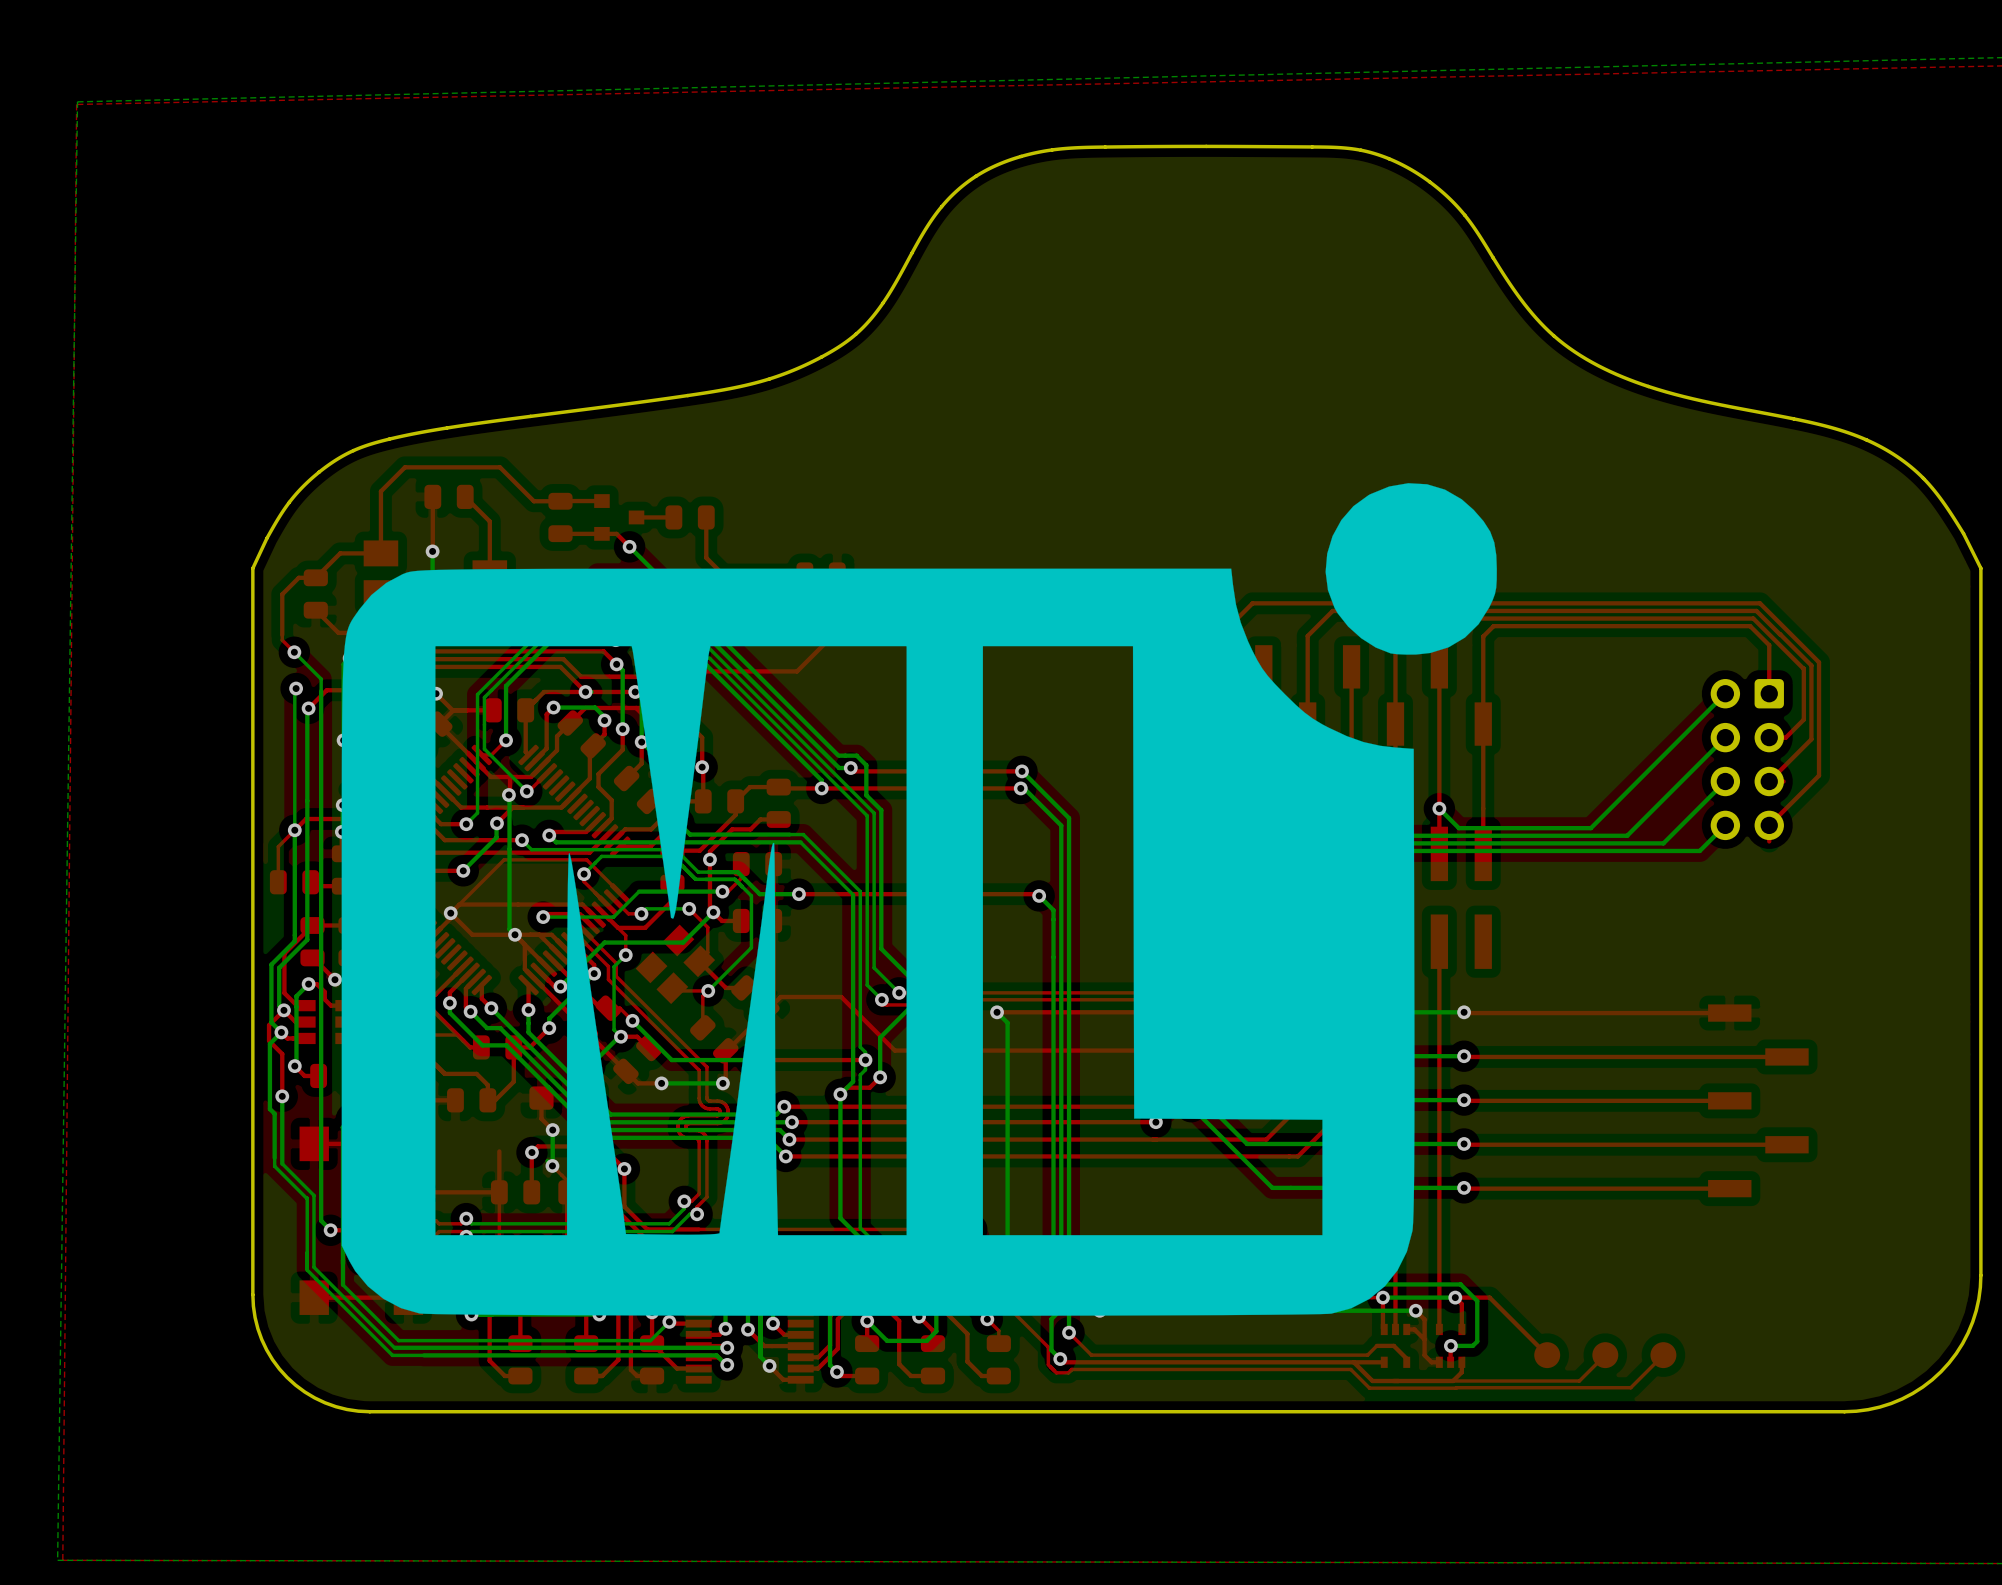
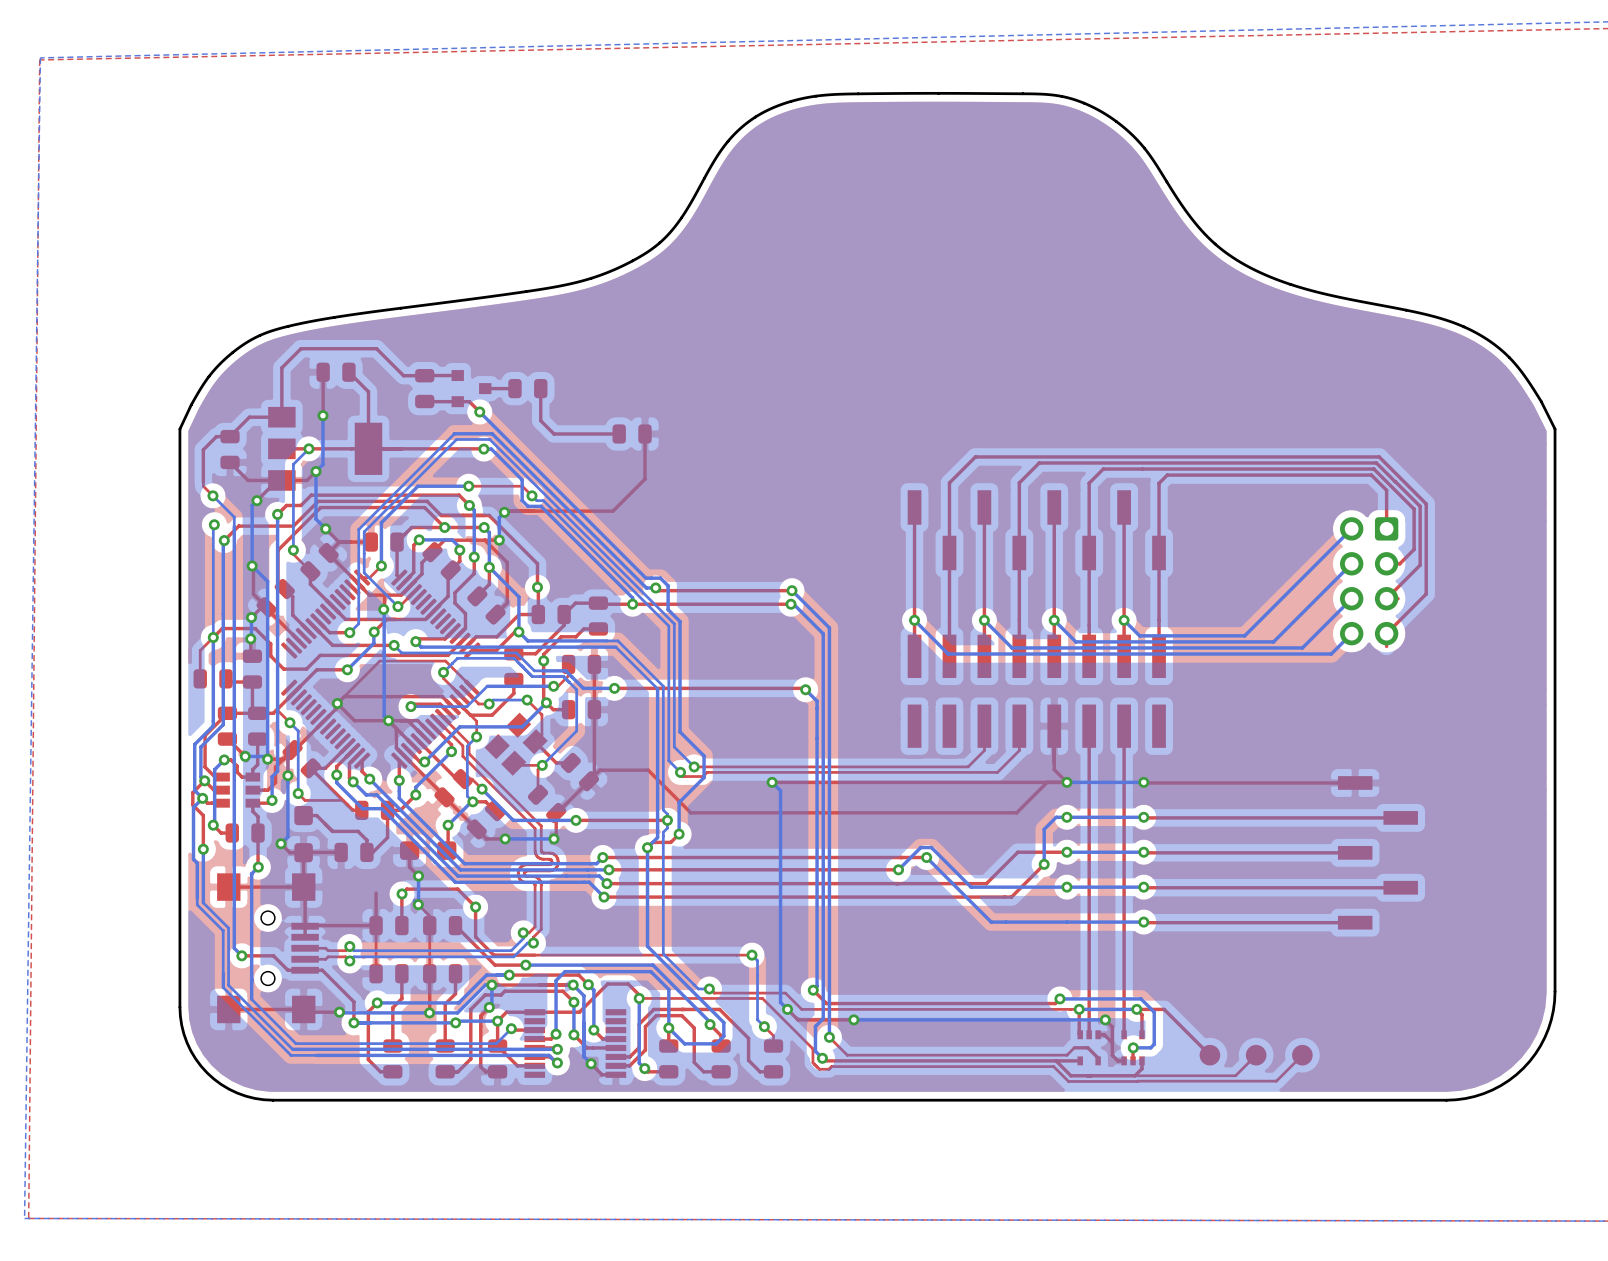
drawing: [341, 483, 1497, 1316] -> none

